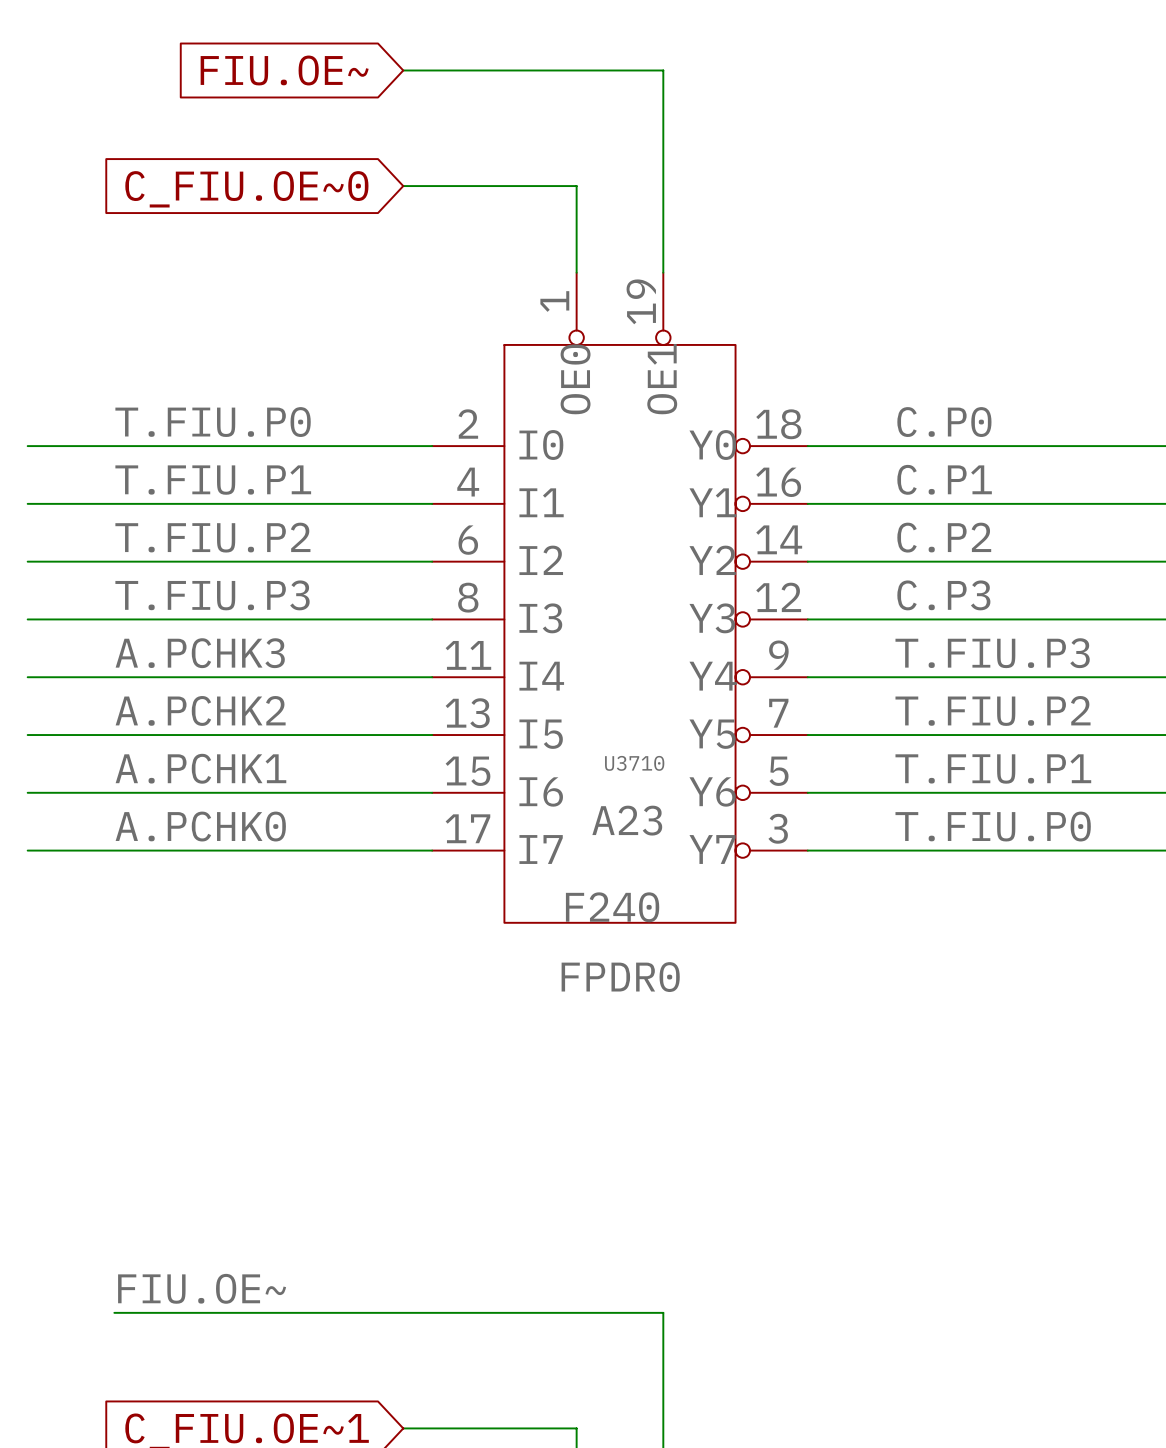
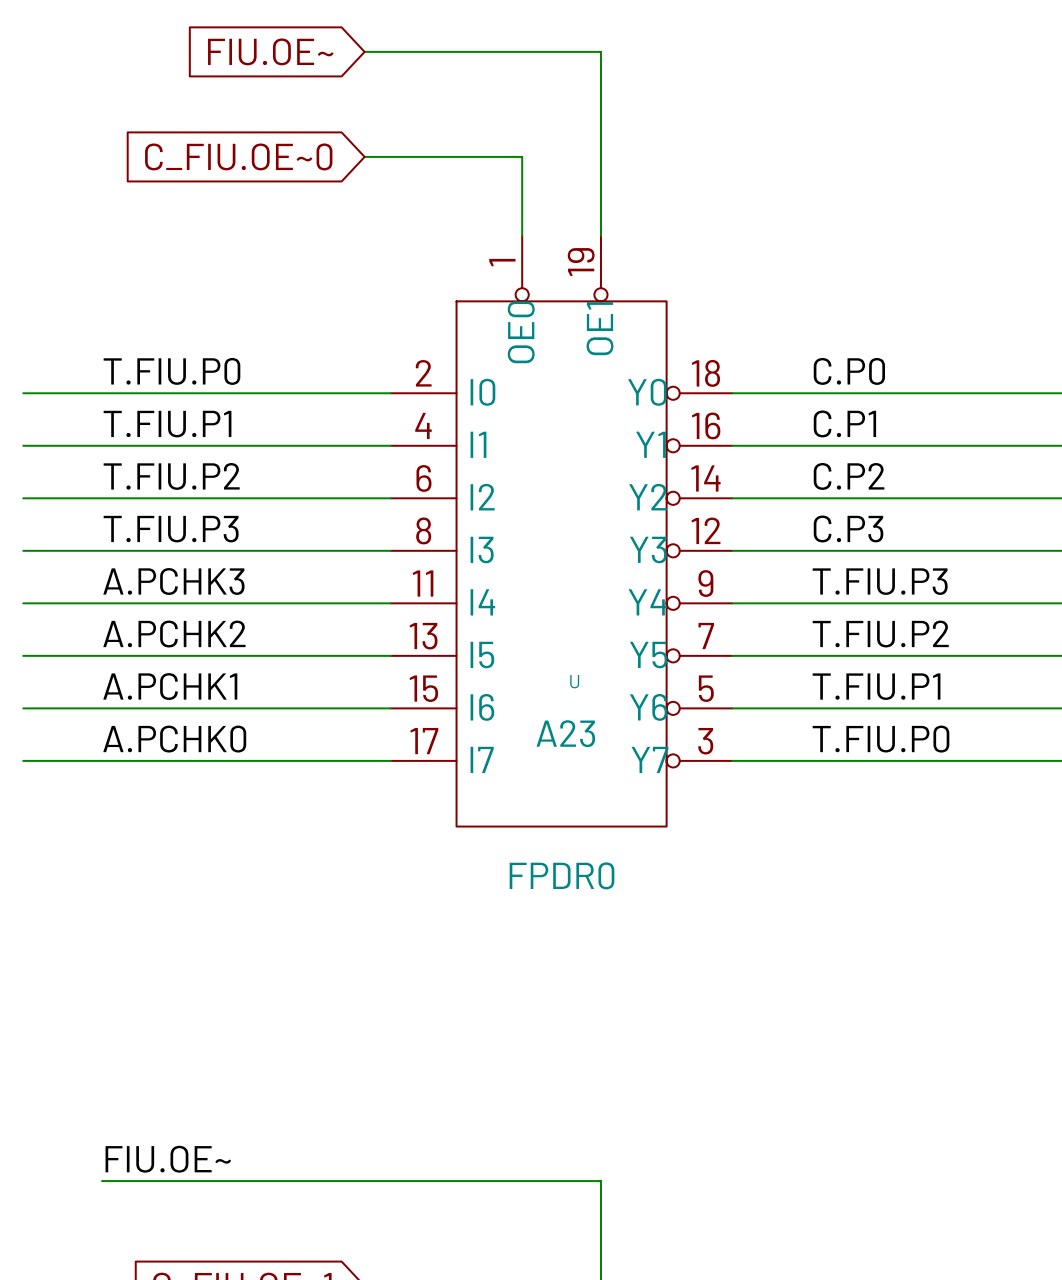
U3710 name: U3710 (634, 763) -> U (574, 681)
U3710 value: F240 (612, 907) -> none

